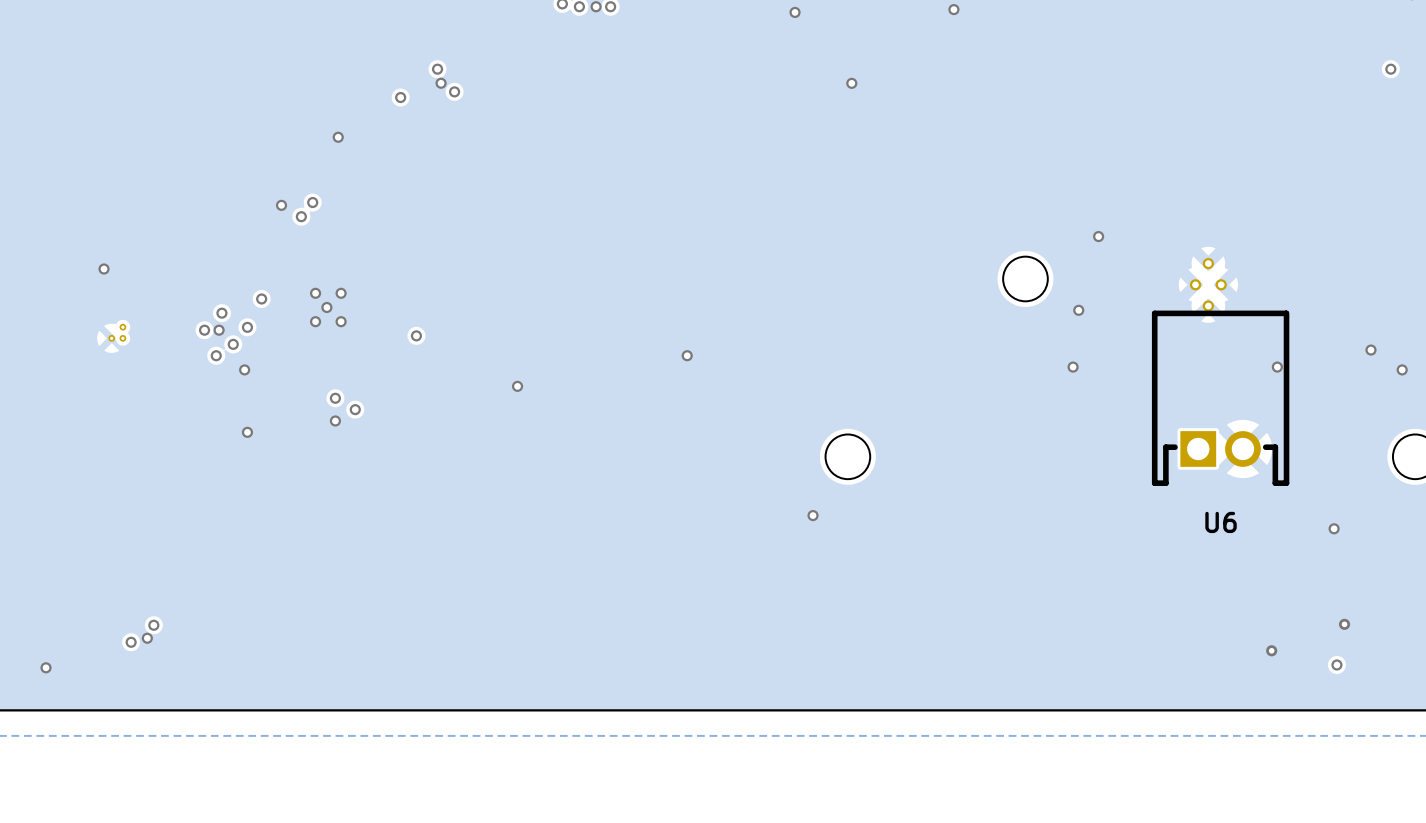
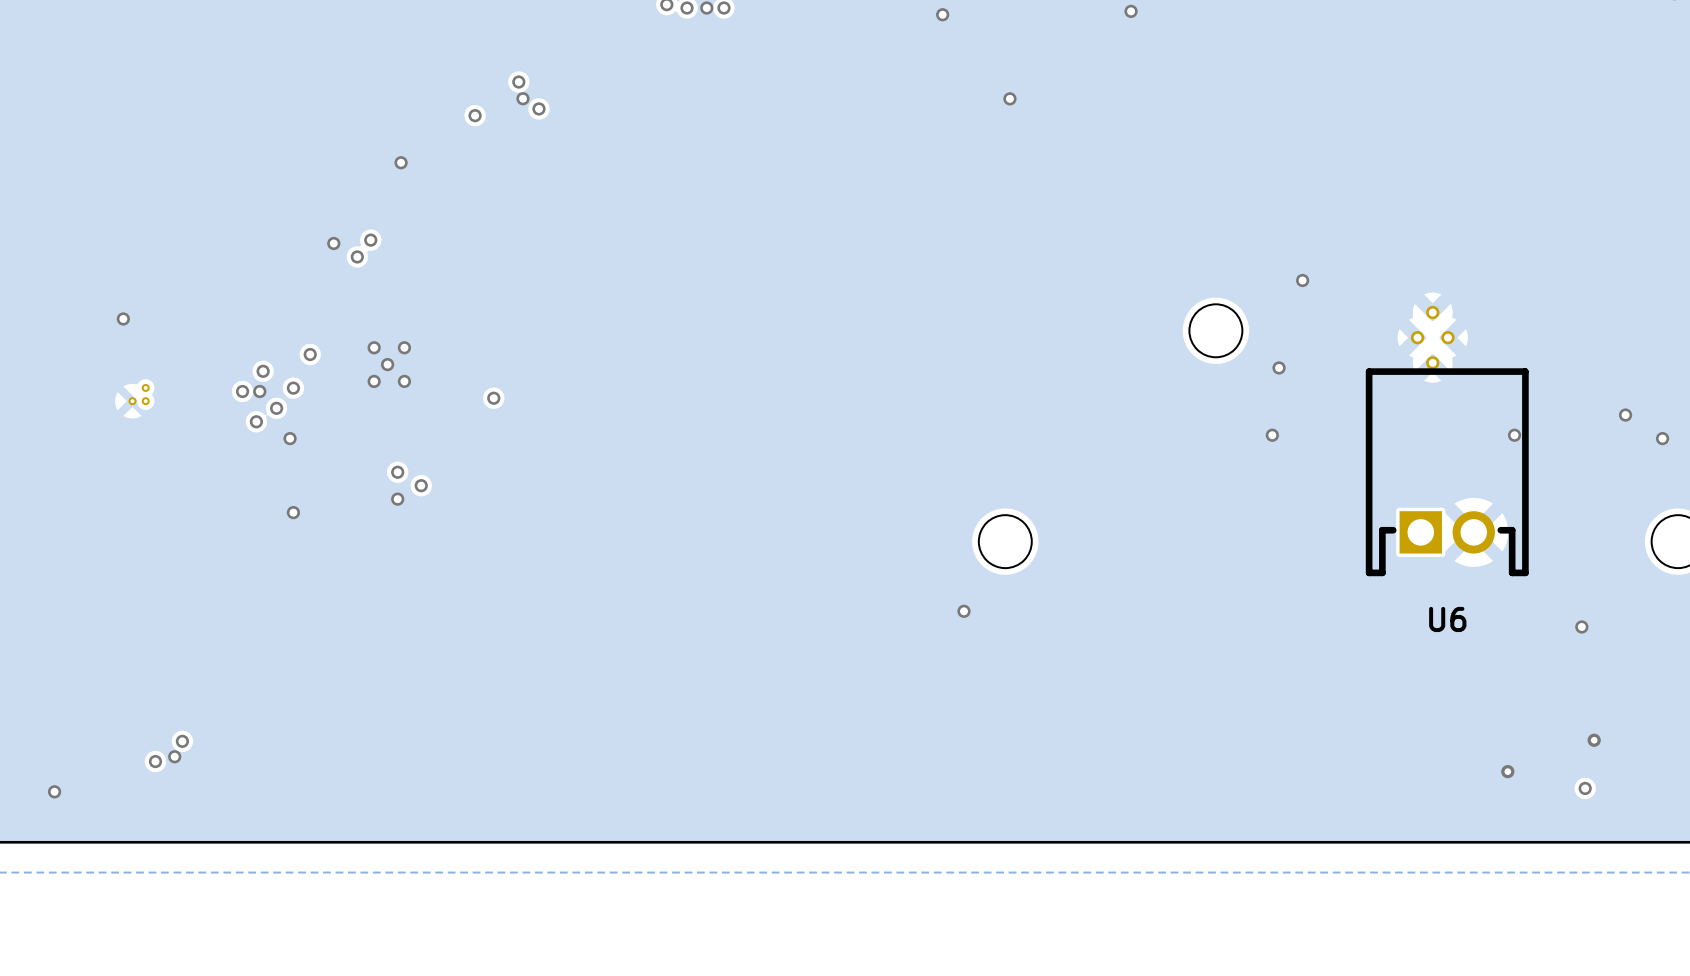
via: (1390, 69) -> none
via: (687, 355) -> none
via: (517, 386) -> none

